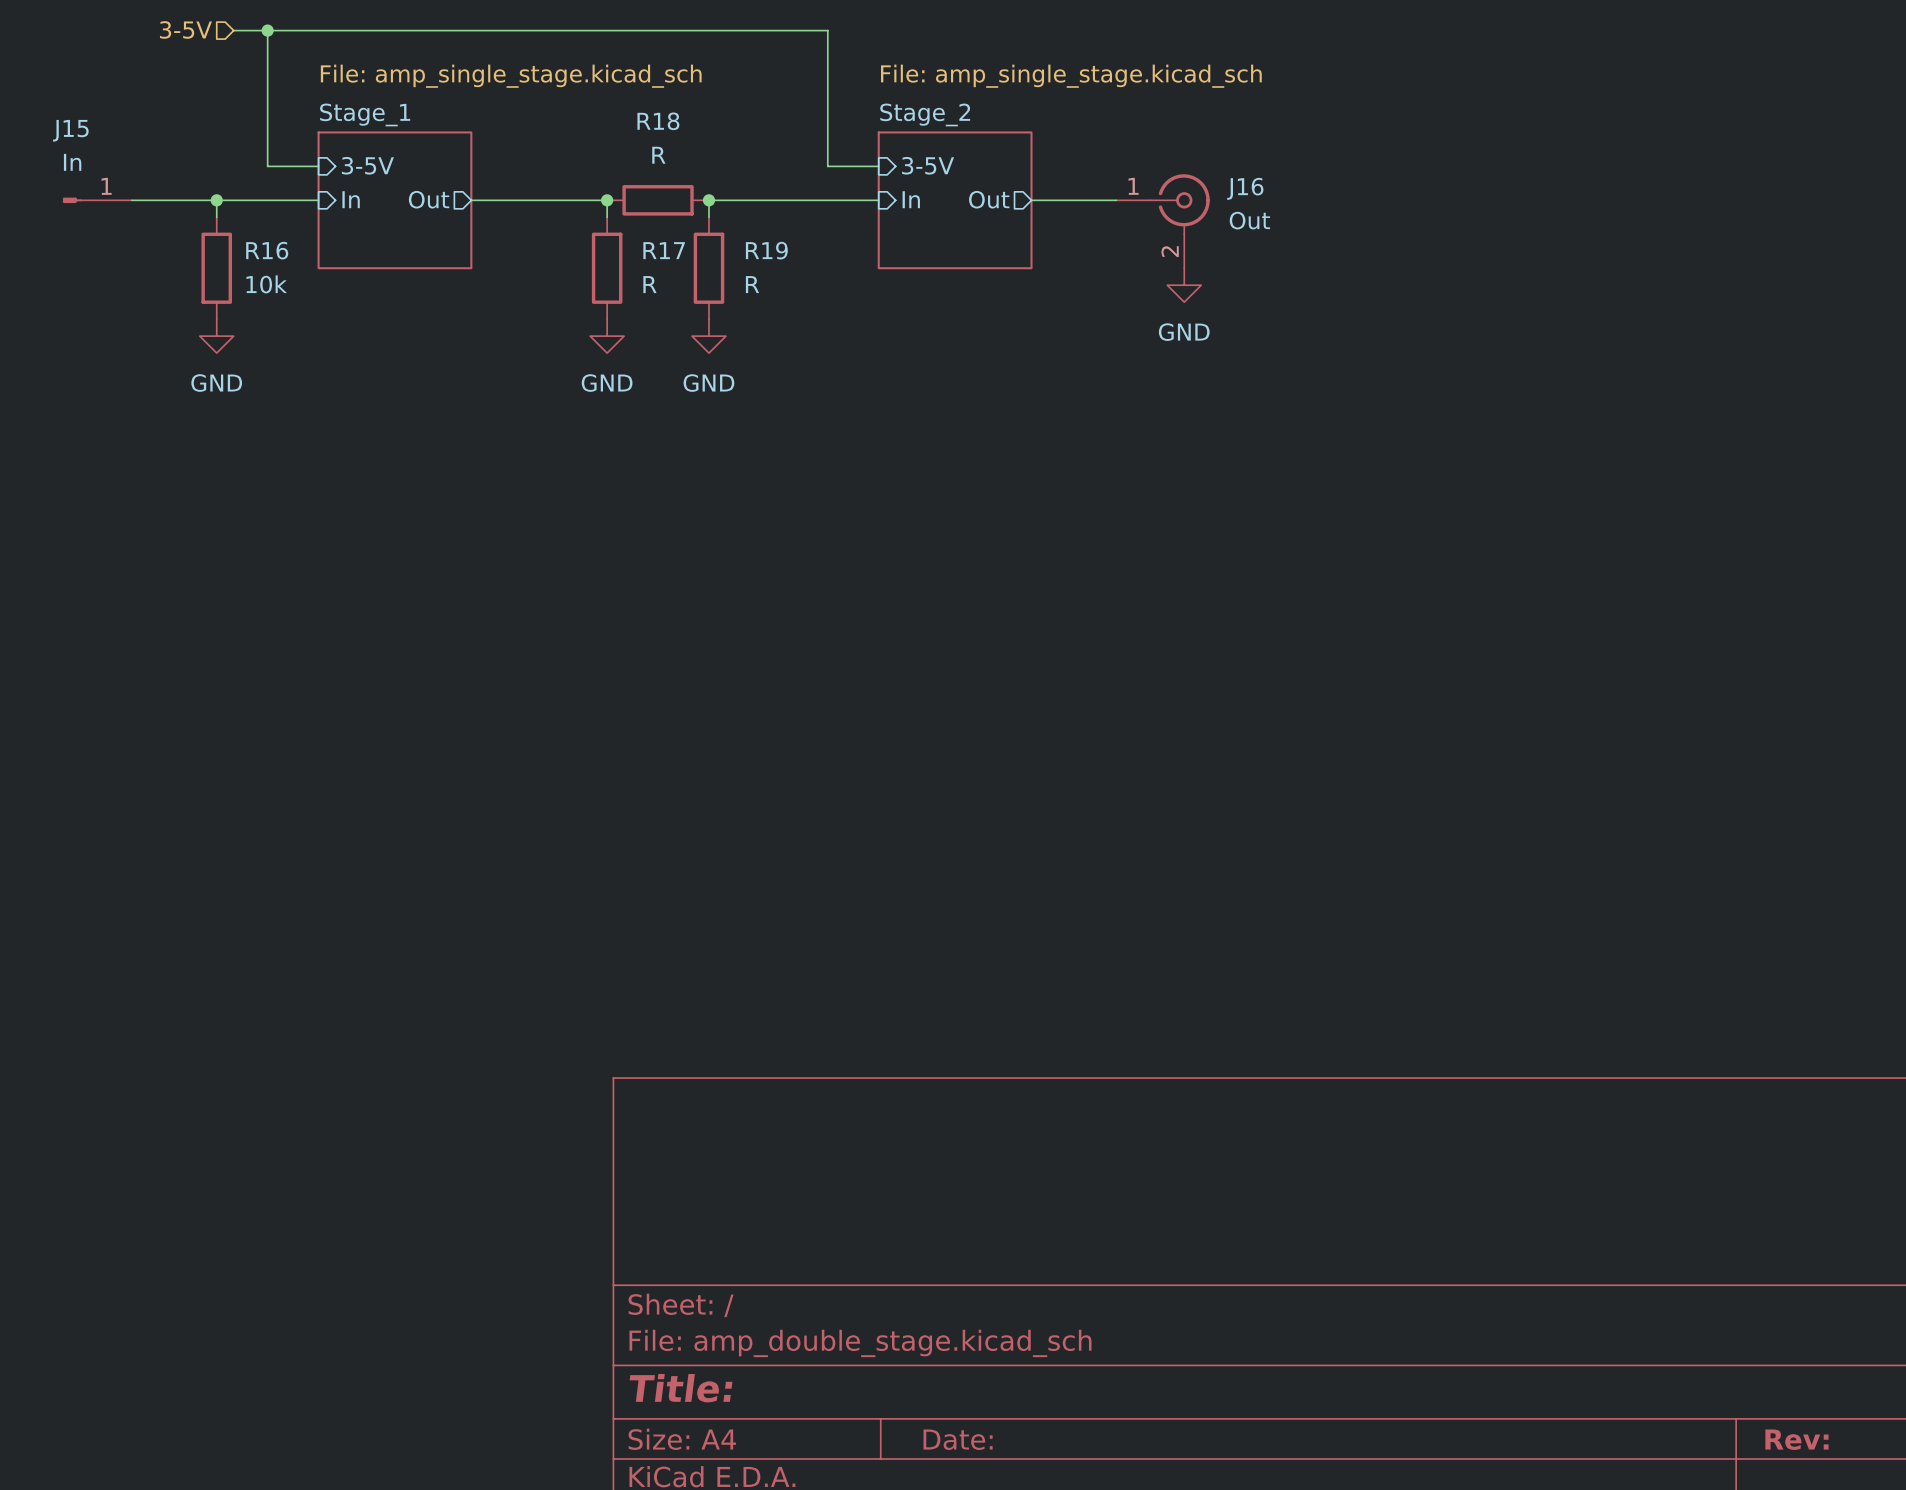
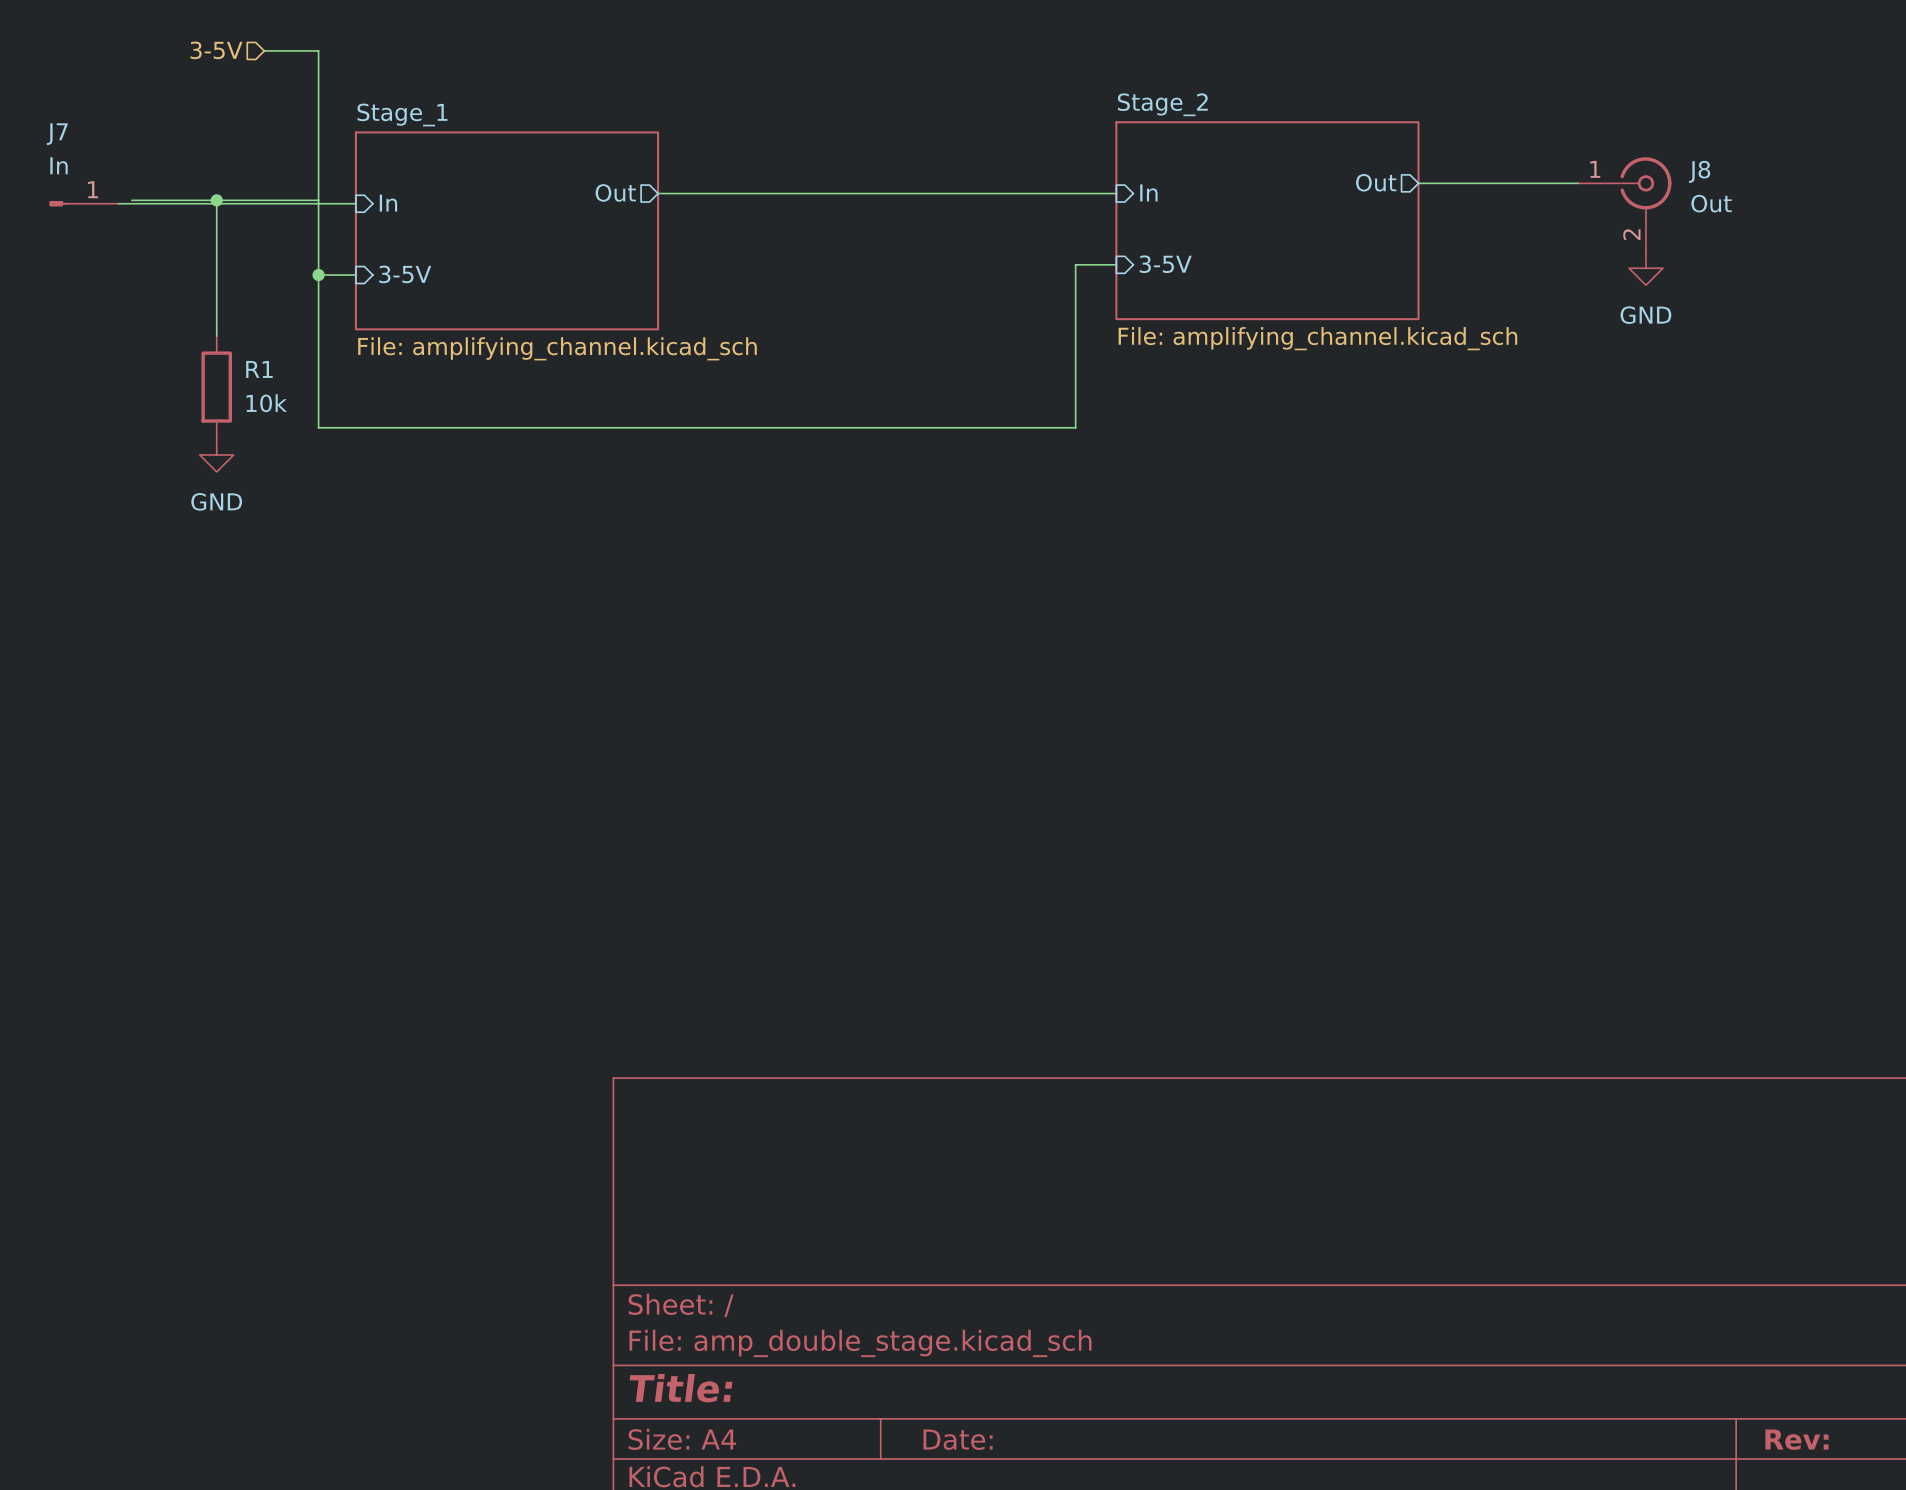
hierarchical label position: 3-5V (185, 29) -> 3-5V (216, 50)
wire: (233, 30) (827, 30) (827, 166) (878, 166) -> none
wire: (267, 30) (267, 166) (318, 166) -> none
junction: (267, 30) -> none
wire: none -> (264, 50) (318, 50) (318, 427) (1075, 427) (1075, 264) (1116, 264)
sheet Stage_1 value: File: amp_single_stage.kicad_sch (511, 76) -> File: amplifying_channel.kicad_sch (557, 348)
sheet Stage_2 value: File: amp_single_stage.kicad_sch (1071, 76) -> File: amplifying_channel.kicad_sch (1317, 338)
sheet Stage_1 name position: Stage_1 (365, 114) -> Stage_1 (402, 114)
sheet Stage_2 name position: Stage_2 (925, 114) -> Stage_2 (1162, 104)
sheet Stage_1 shape: [317, 131, 473, 270] -> [354, 131, 660, 331]
sheet Stage_2 shape: [877, 131, 1033, 270] -> [1115, 121, 1420, 321]
sheet pin position: 3-5V (367, 165) -> 3-5V (405, 274)
sheet pin position: 3-5V (928, 165) -> 3-5V (1165, 264)
sheet pin: none -> Out (1376, 182)
wire: none -> (1418, 183) (1578, 183)
sheet pin: none -> Out (615, 192)
wire: none -> (658, 193) (1116, 193)
sheet pin position: In (351, 199) -> In (388, 203)
sheet pin: Out (429, 199) -> none
sheet pin position: In (911, 199) -> In (1148, 192)
sheet pin: Out (989, 199) -> none
J15: In (97, 200) -> none
wire: (471, 200) (607, 200) (607, 217) -> none
junction: (607, 200) -> none
R18: R (658, 200) -> none
junction: (708, 200) -> none
wire: (878, 200) (708, 200) (708, 217) -> none
wire: (1031, 200) (1116, 200) -> none
J7: none -> In (83, 203)
wire: none -> (118, 203) (355, 203)
J8: none -> Out (1624, 204)
wire: none -> (216, 217) (216, 336)
J16: Out (1163, 221) -> none
R16: 10k (216, 268) -> none
R17: R (607, 268) -> none
R19: R (708, 268) -> none
power symbol: none -> GND (1645, 268)
wire: none -> (318, 275) (355, 275)
junction: none -> (318, 275)
power symbol: GND (1184, 285) -> none
power symbol position: GND (216, 336) -> GND (216, 454)
power symbol: GND (607, 336) -> none
power symbol: GND (708, 336) -> none
R1: none -> 10k (216, 387)

